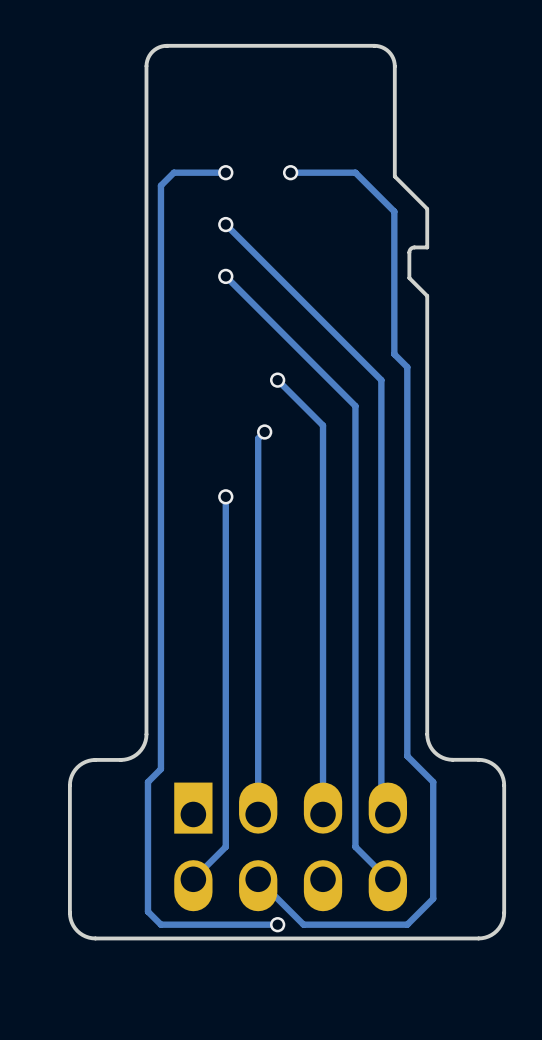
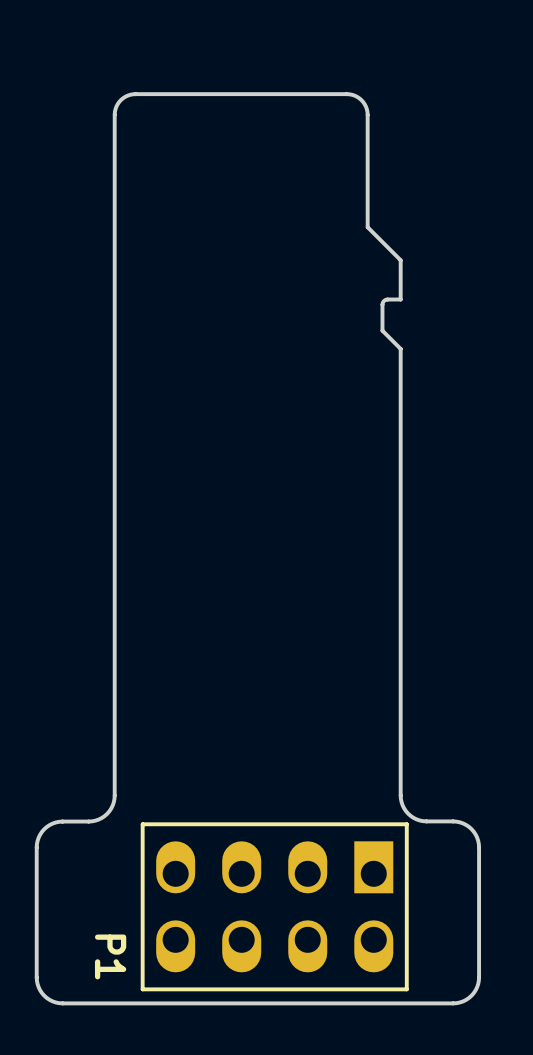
track: (225, 172) (173, 172) (160, 185) (160, 769) (147, 782) (147, 911) (160, 924) (277, 924) -> none
via: (225, 172) -> none
track: (290, 172) (355, 172) (394, 211) (394, 354) (407, 367) (407, 756) (433, 782) (433, 898) (407, 924) (303, 924) (258, 879) -> none
via: (290, 172) -> none
track: (225, 224) (381, 380) (381, 808) (387, 814) -> none
via: (225, 224) -> none
track: (225, 276) (355, 406) (355, 846) (387, 879) -> none
via: (225, 276) -> none
track: (277, 380) (323, 425) (323, 814) -> none
via: (277, 380) -> none
track: (264, 432) (258, 438) (258, 814) -> none
via: (264, 432) -> none
track: (225, 496) (225, 846) (193, 879) -> none
via: (225, 496) -> none
P1 side: top (290, 846) -> bottom (274, 906)
via: (277, 924) -> none

